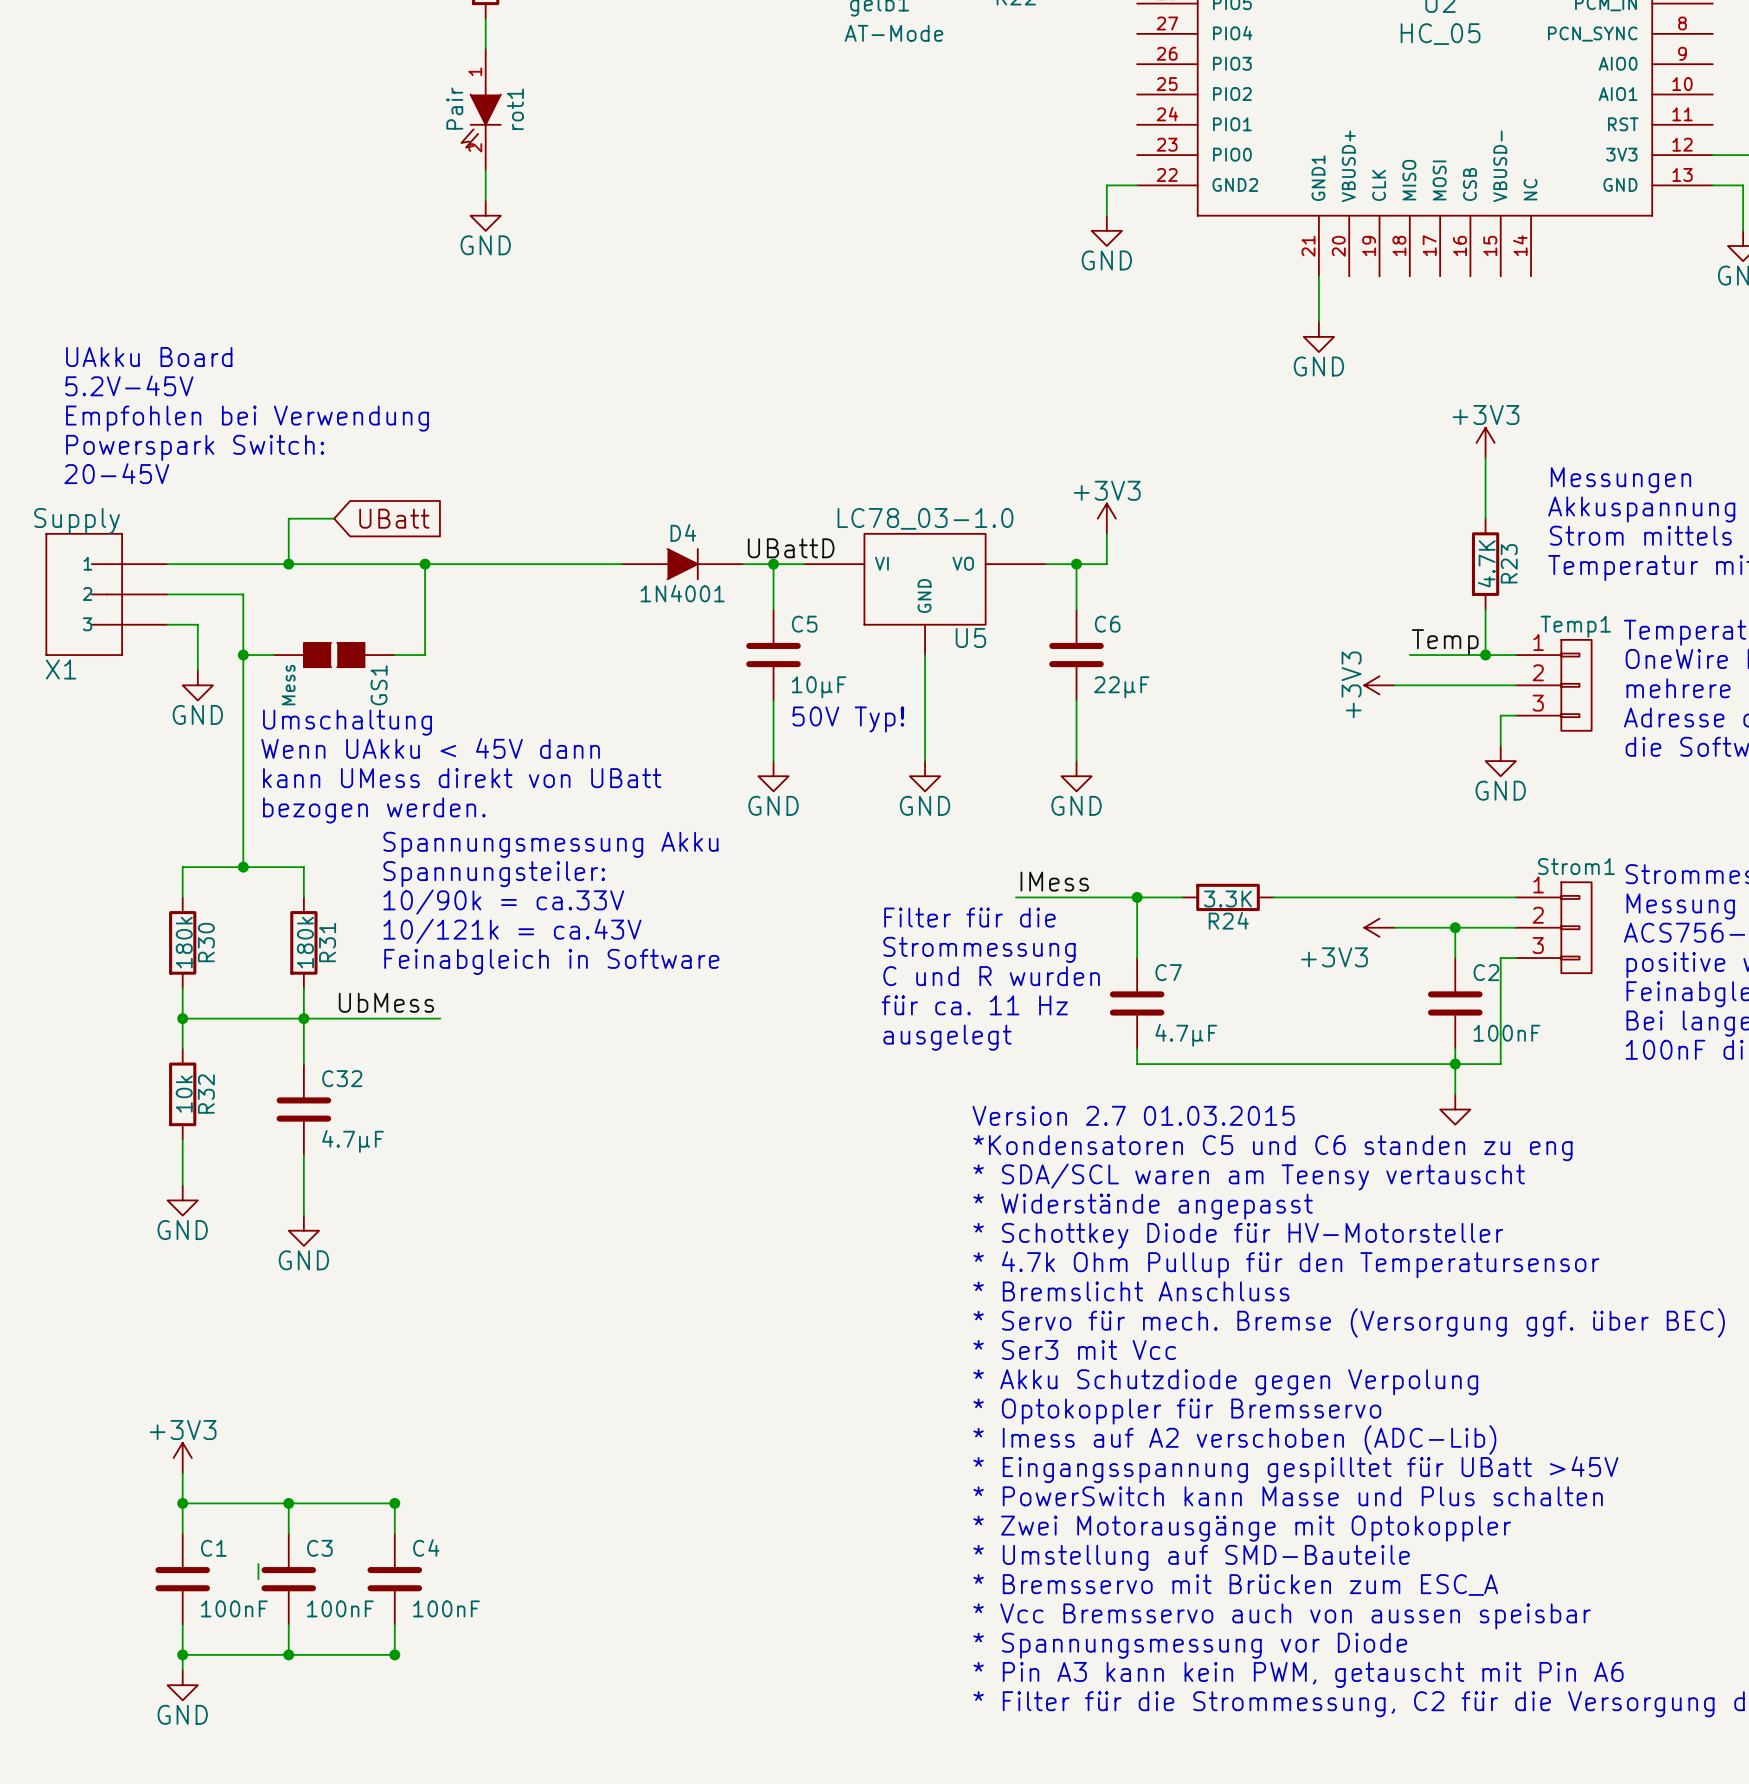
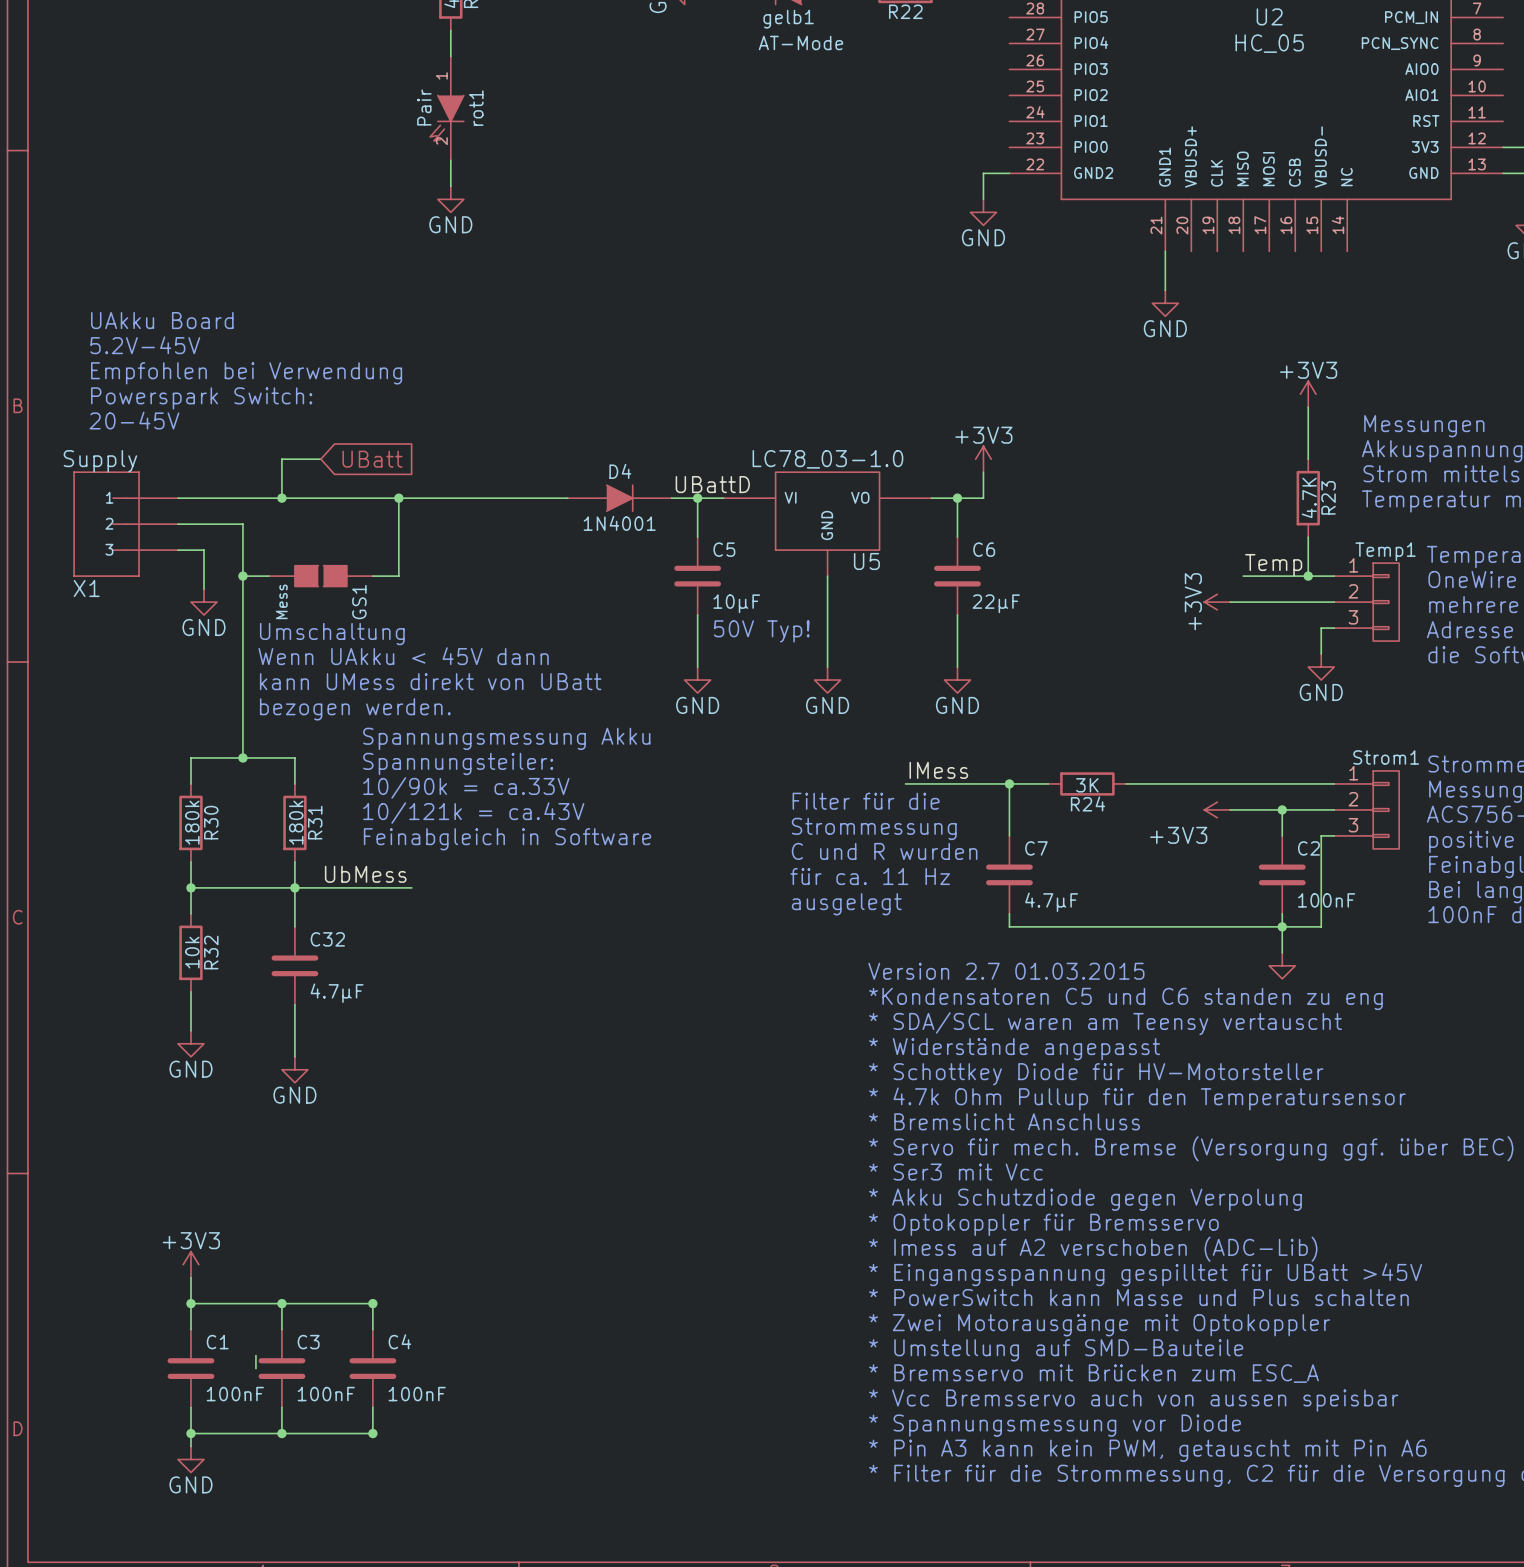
R24 value: 3.3K (1227, 898) -> 3K (1087, 785)

